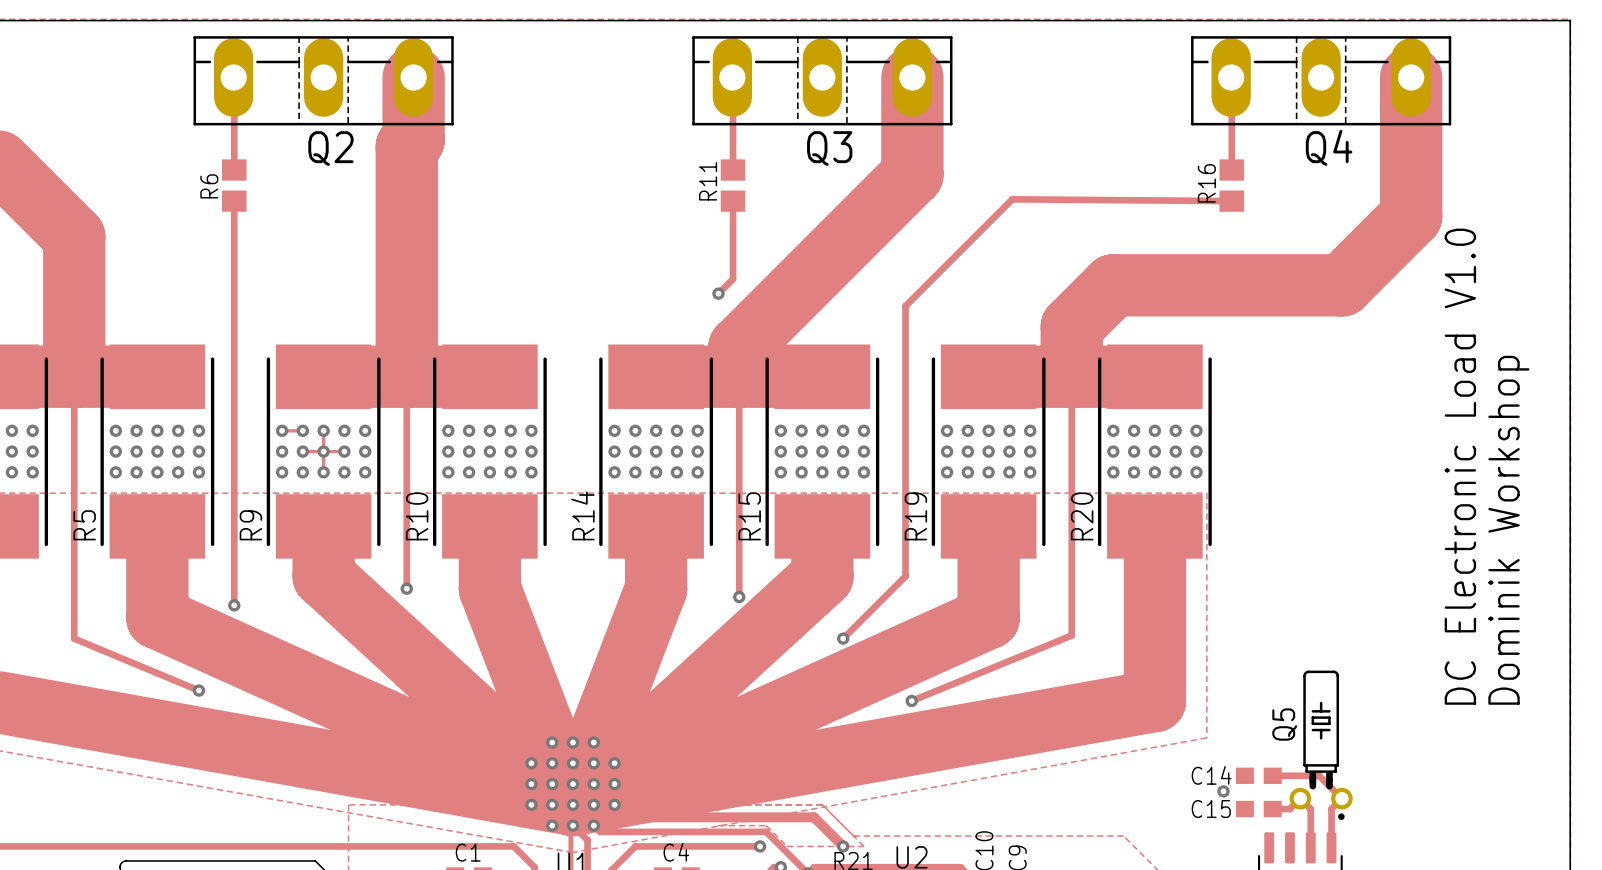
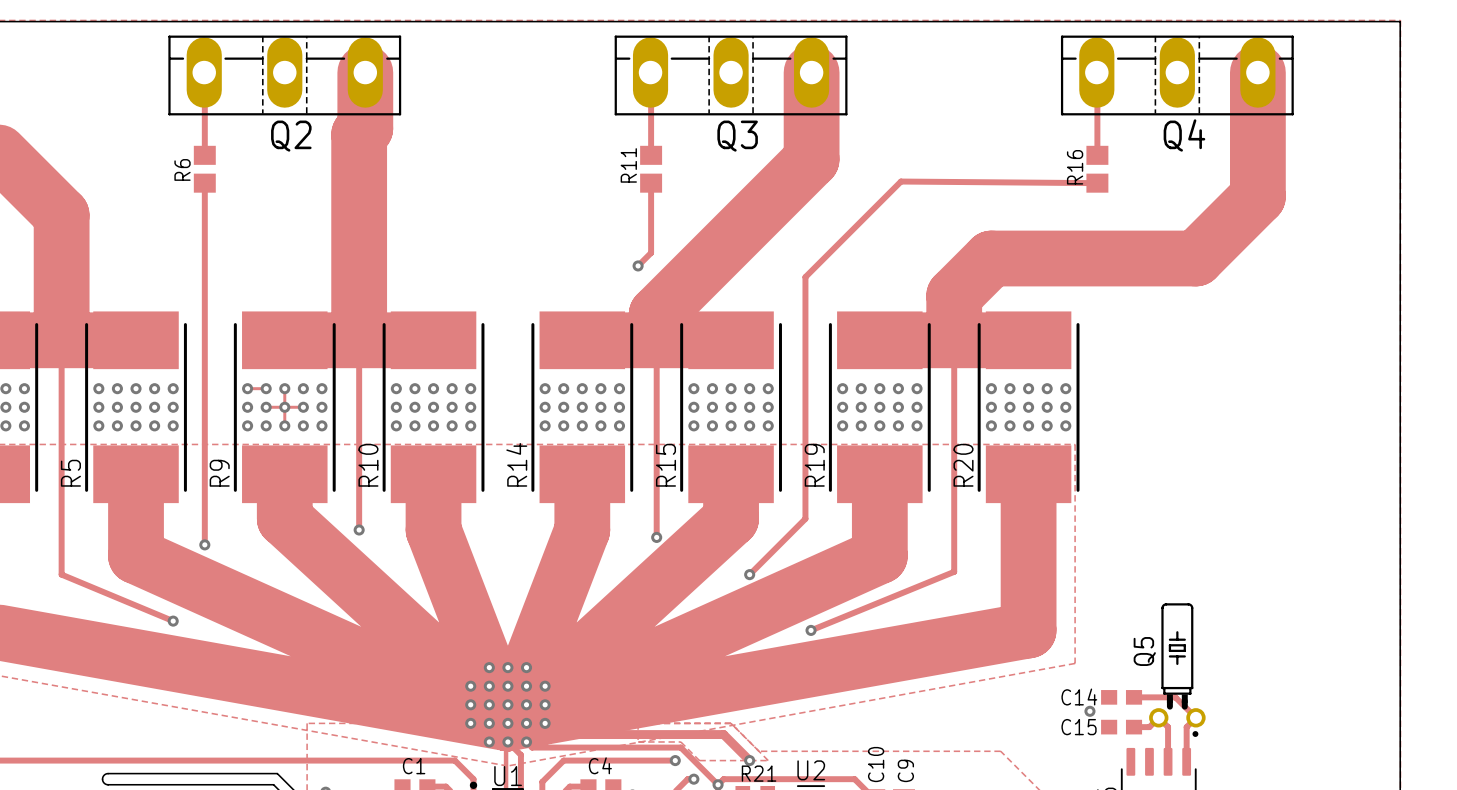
text: DC Electronic Load V1.0 (1460, 466) -> none
text: Dominik Workshop (1508, 530) -> none

